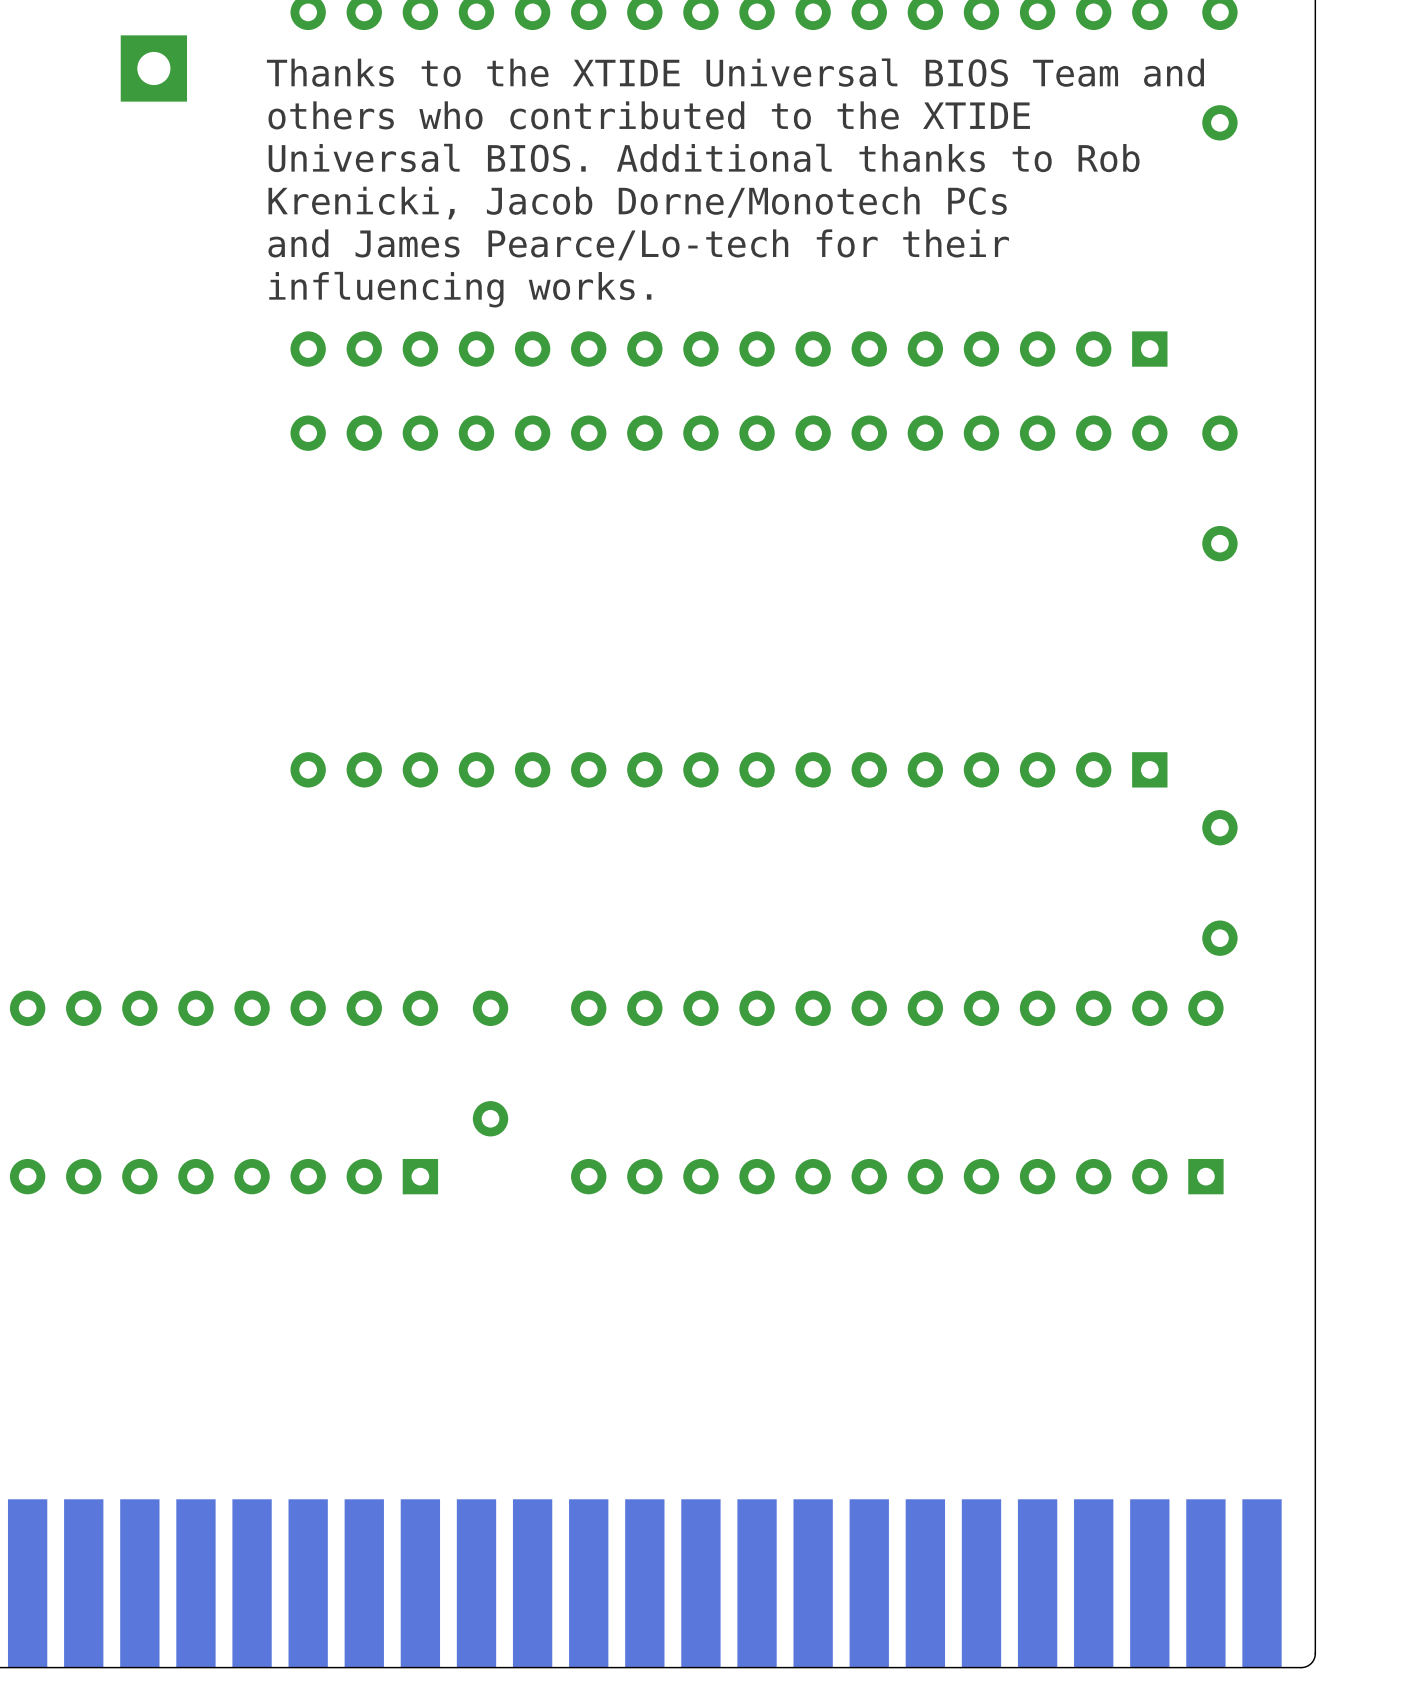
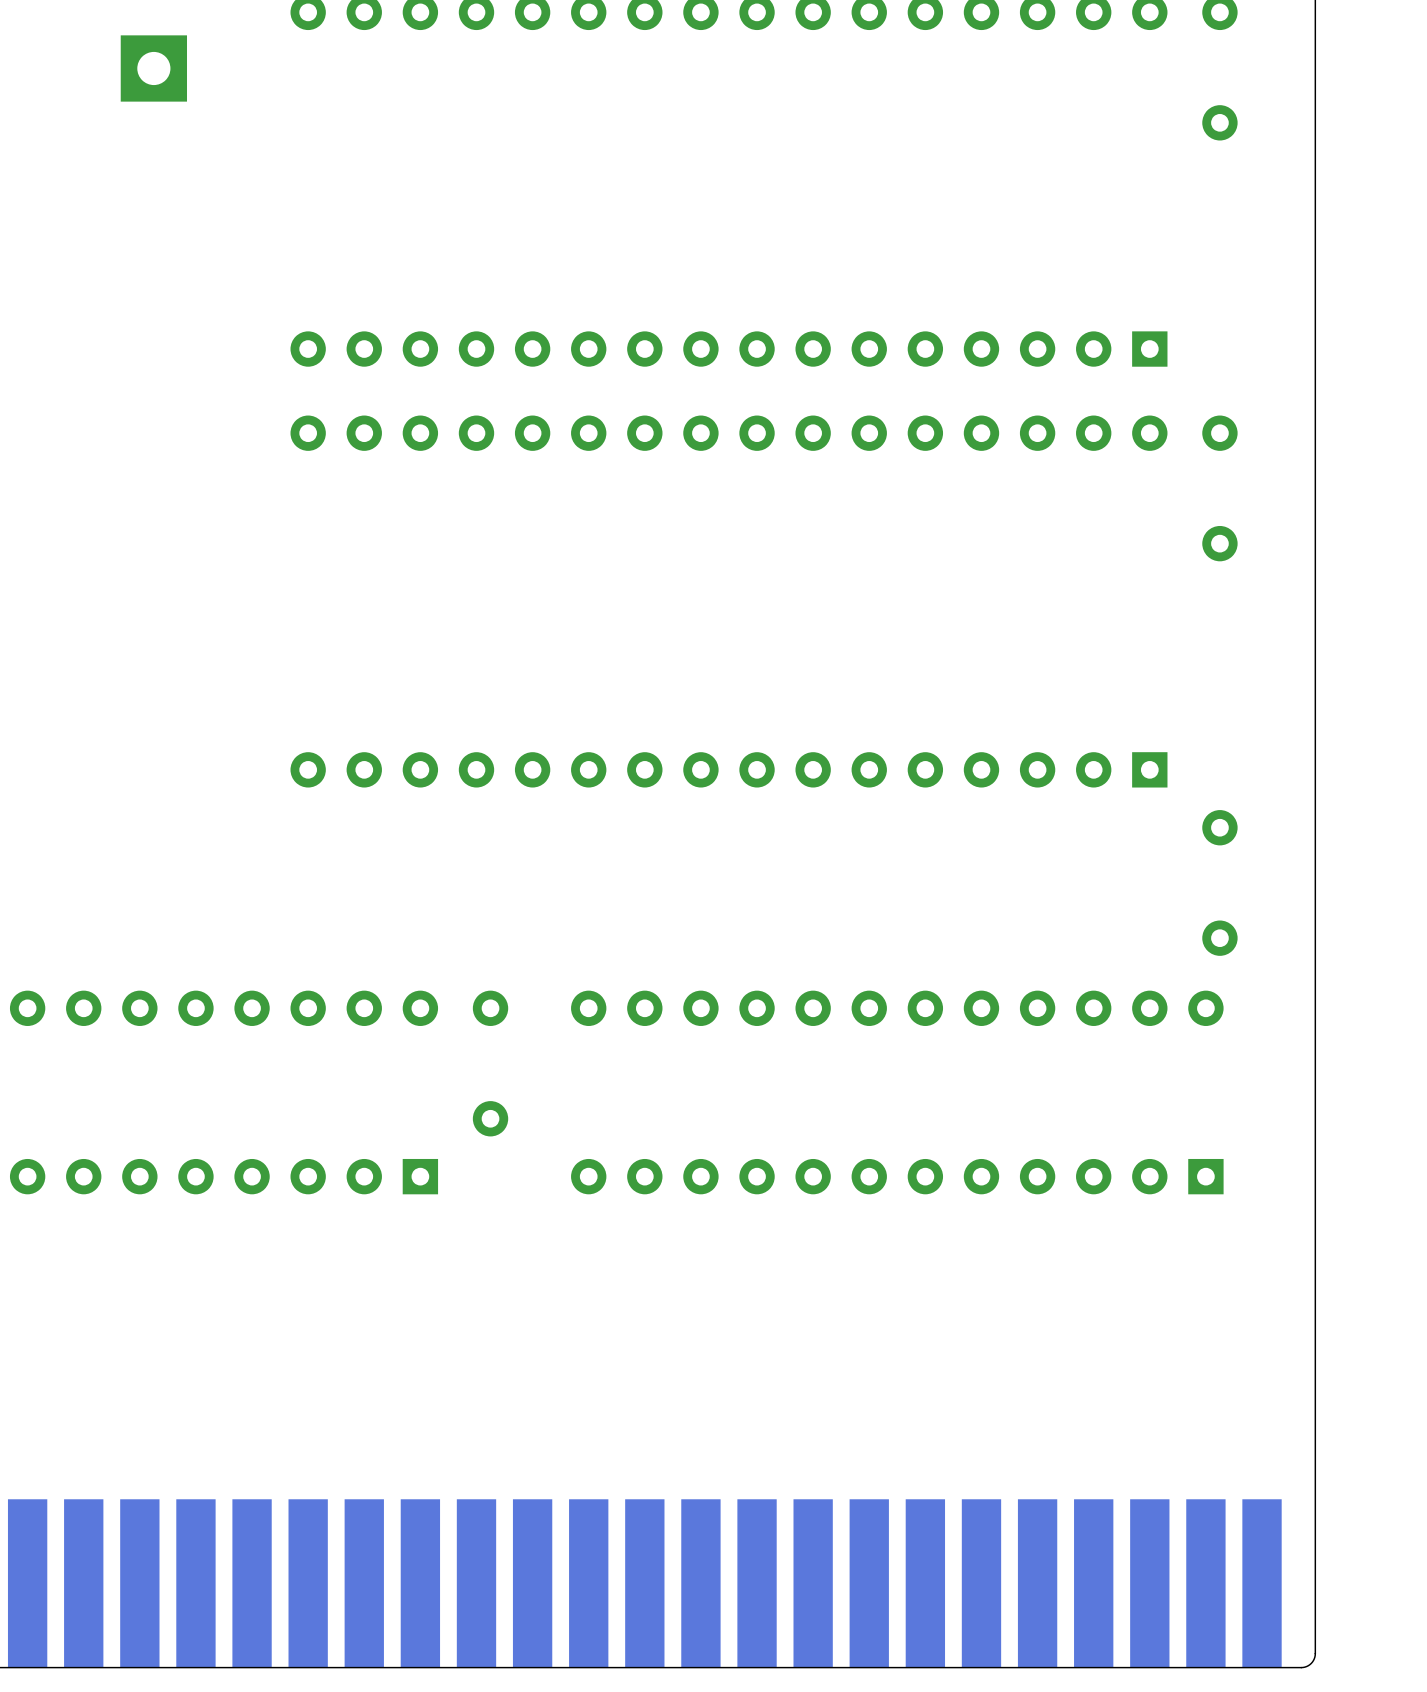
text: Thanks to the XTIDE Universal BIOS Team and (735, 72) -> none
text: others who contributed to the XTIDE (649, 115) -> none
text: Universal BIOS. Additional thanks to Rob (704, 157) -> none
text: Krenicki, Jacob Dorne/Monotech PCs (637, 203) -> none
text: and James Pearce/Lo-tech for their (638, 244) -> none
text: influencing works. (460, 289) -> none

